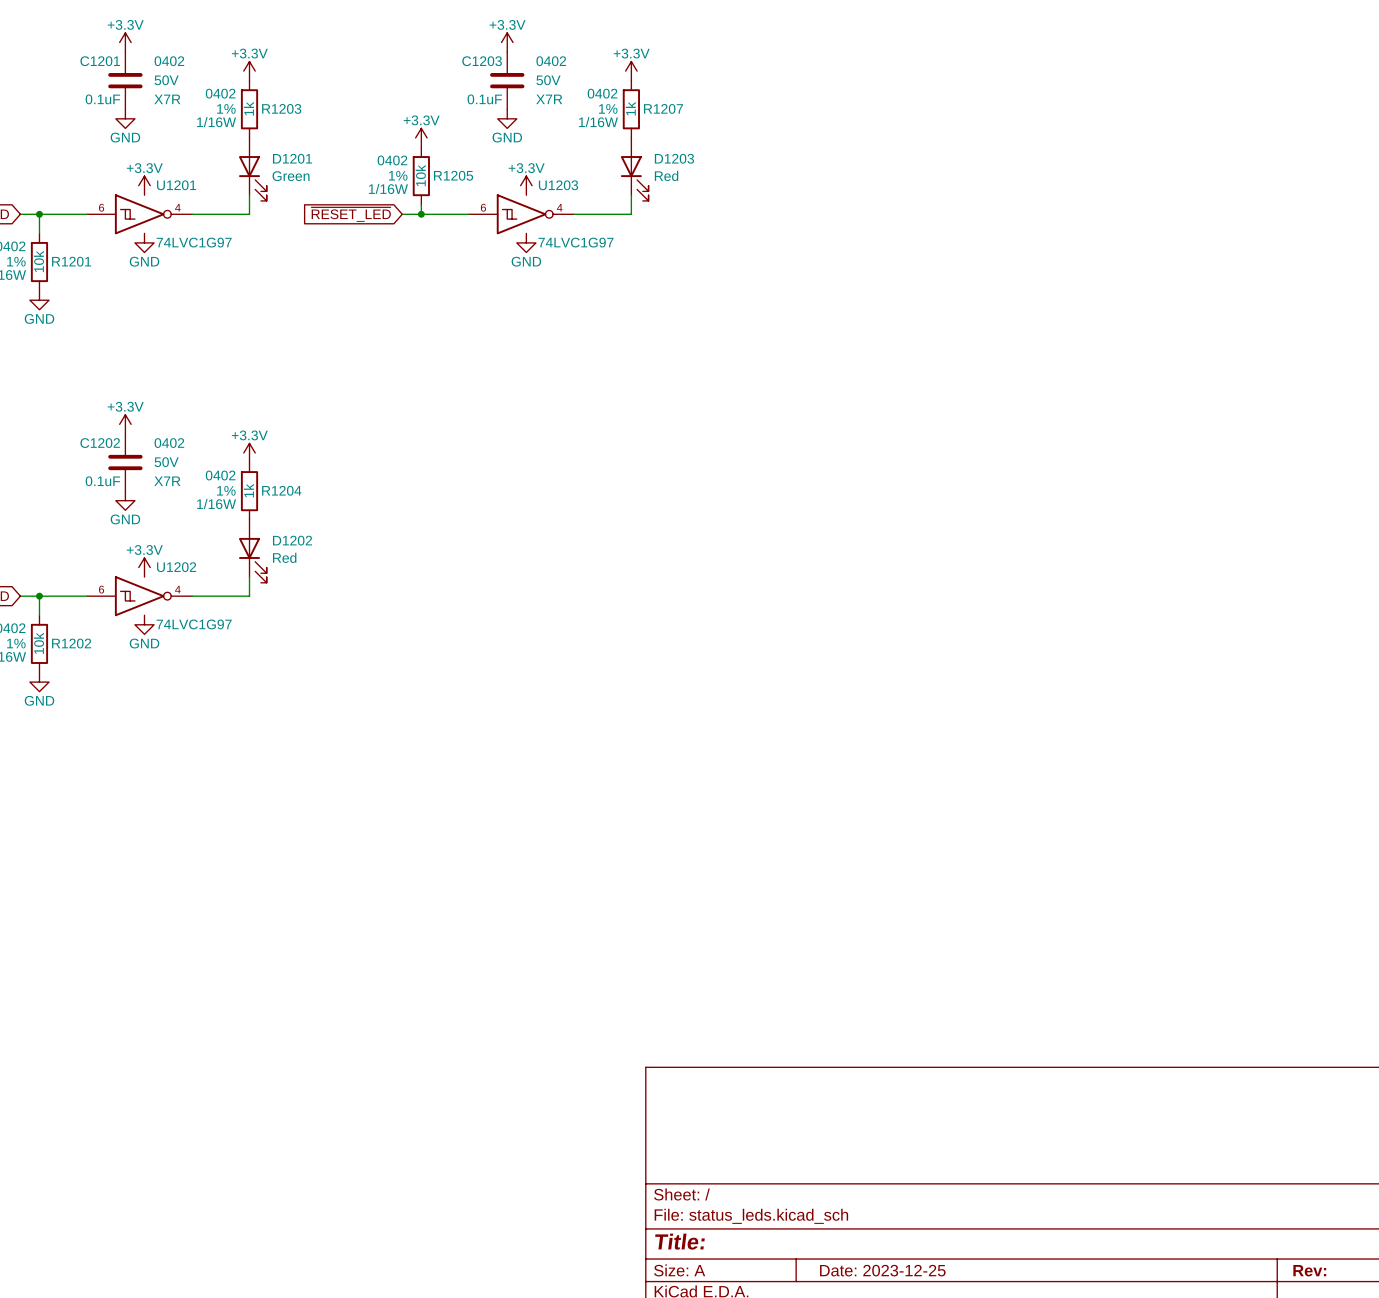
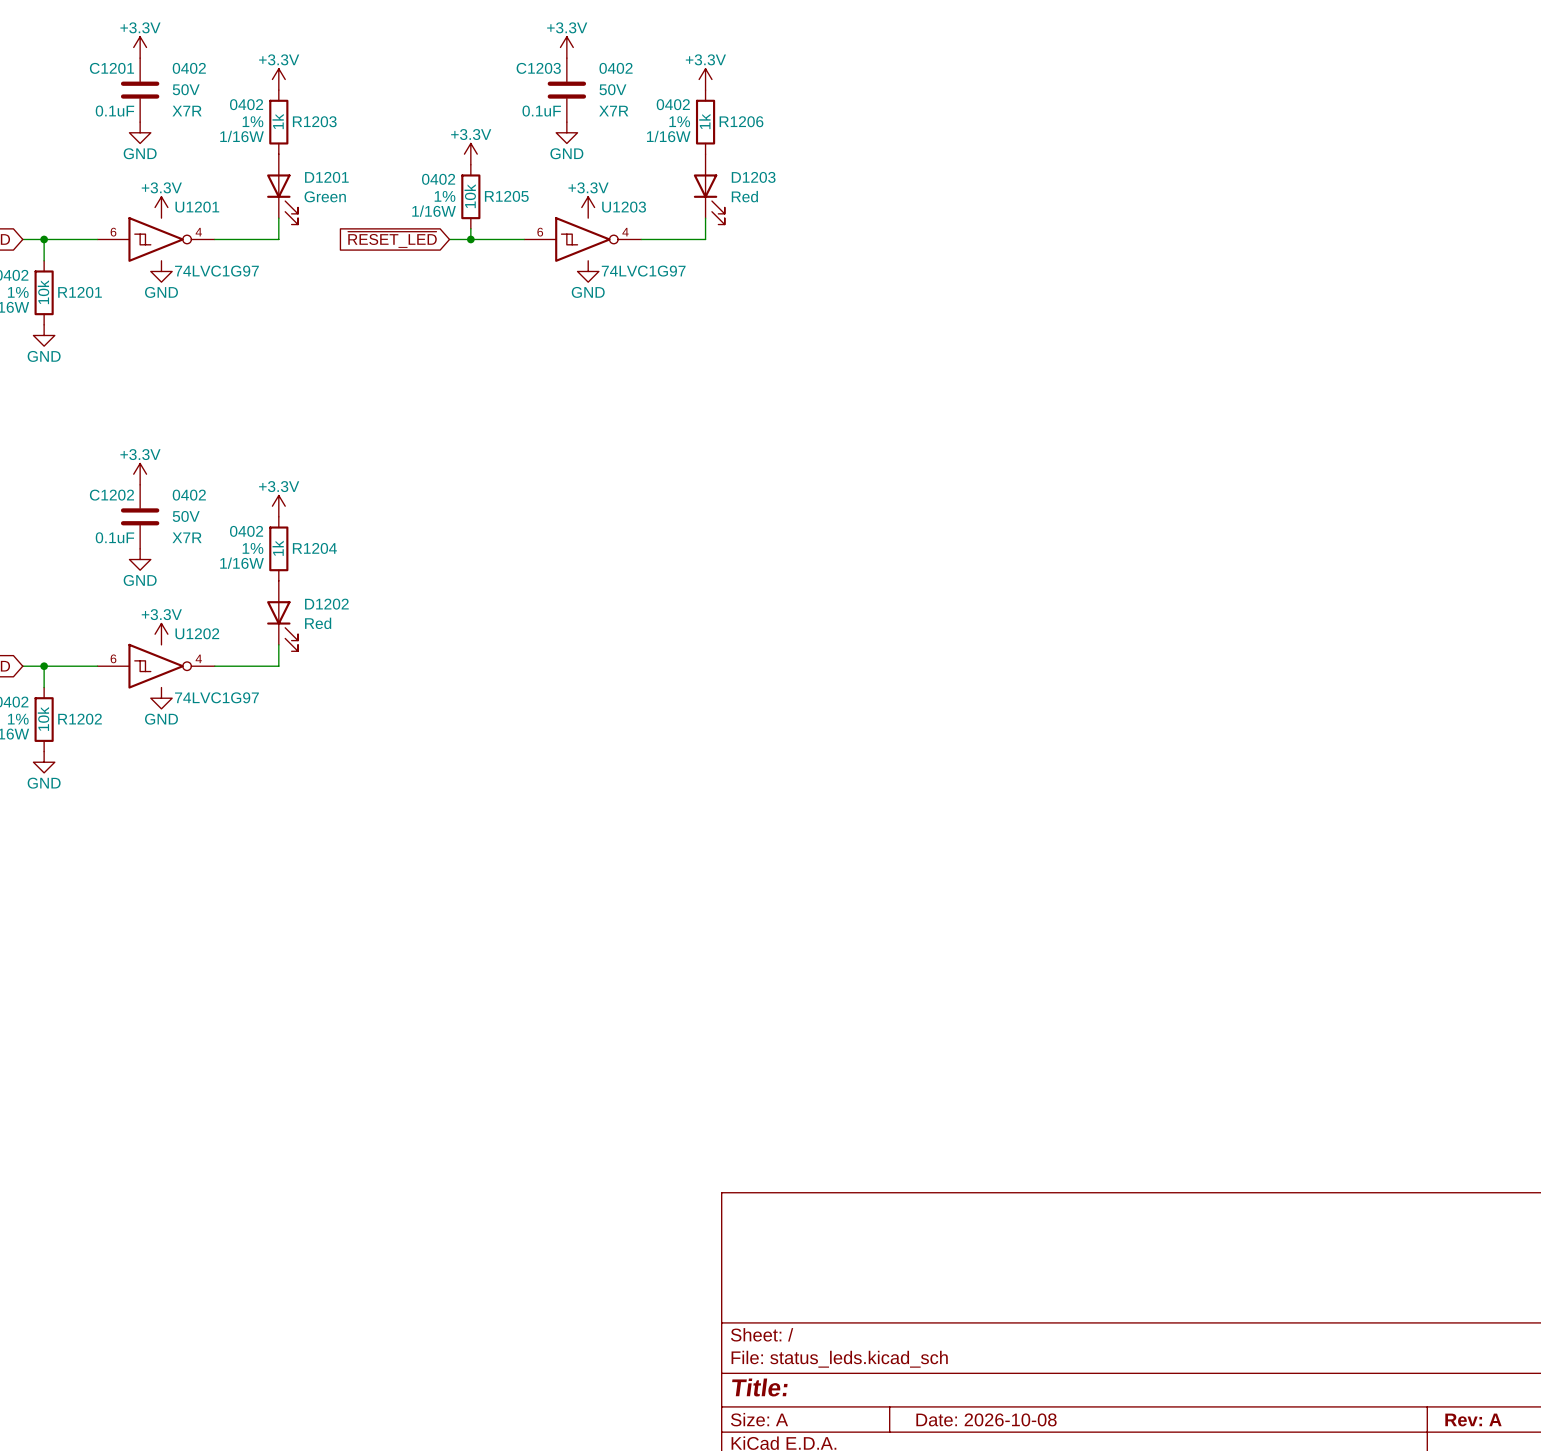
R1207 name: R1207 (663, 108) -> R1206 (741, 121)
title block: Date: 2023-12-25 (882, 1270) -> Date: 2026-10-08 (986, 1419)
title block: Rev: (1309, 1270) -> Rev: A (1473, 1420)

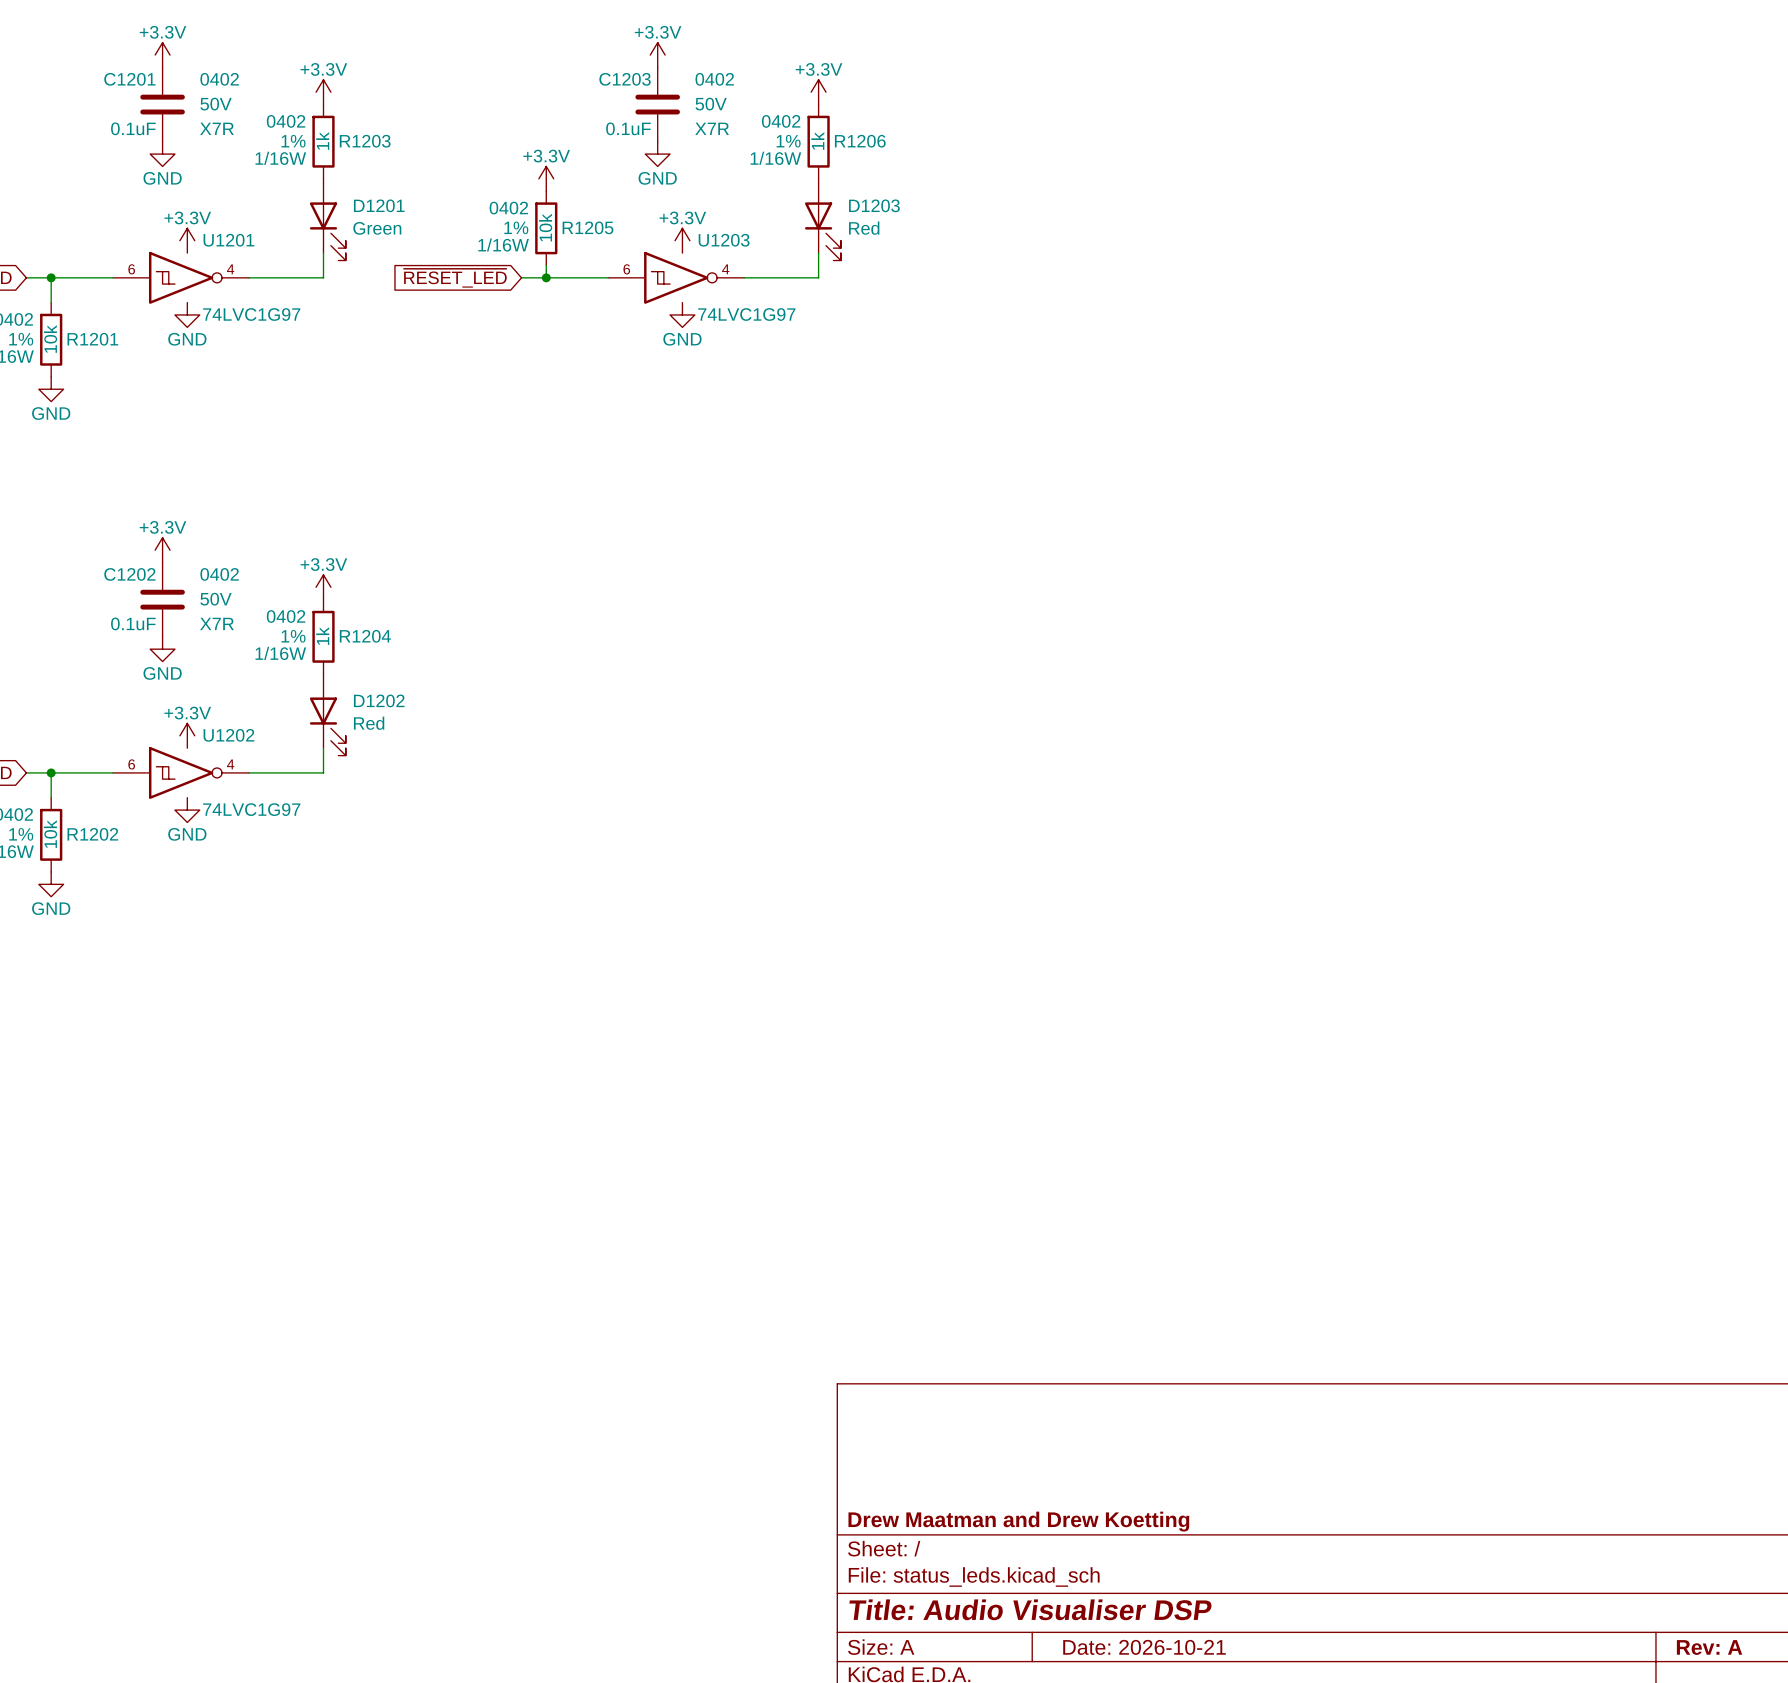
title block: none -> Drew Maatman and Drew Koetting (1018, 1521)
title block: Title: (759, 1387) -> Title: Audio Visualiser DSP (1030, 1609)
title block: Date: 2026-10-08 (986, 1419) -> Date: 2026-10-21 (1144, 1647)

